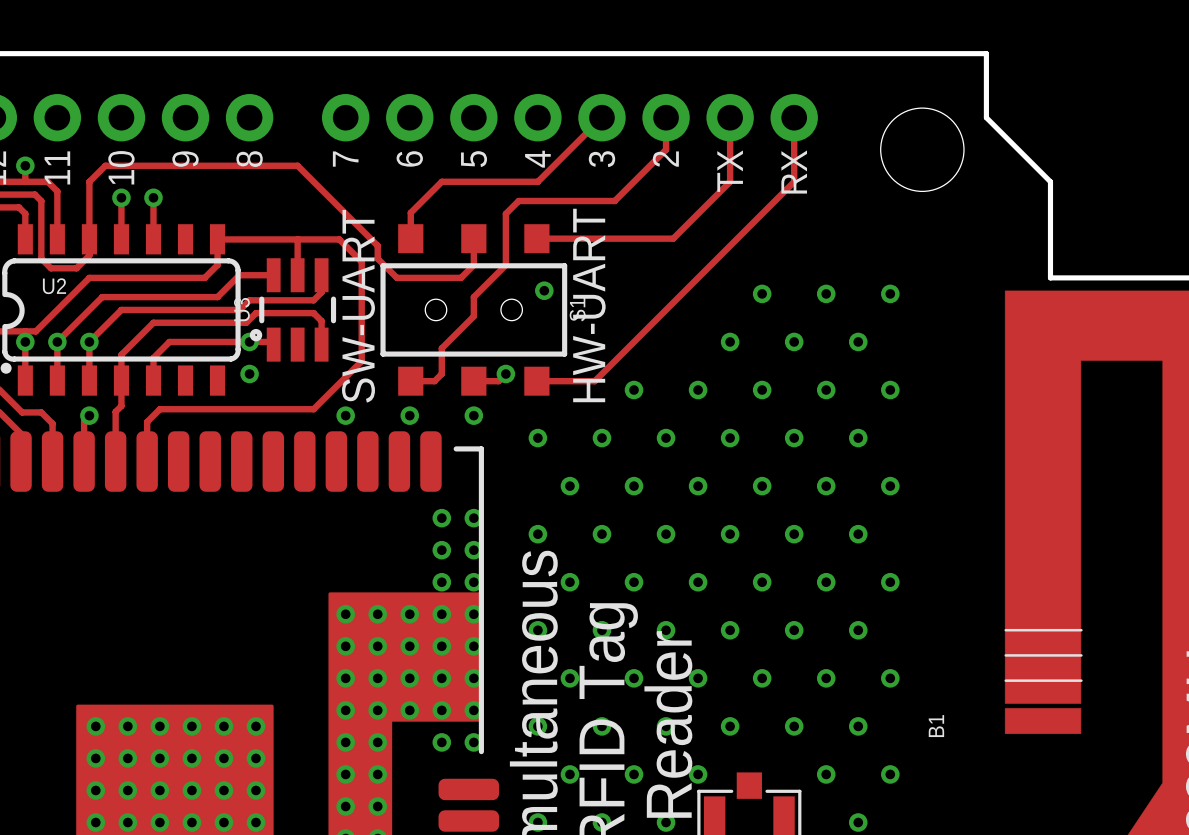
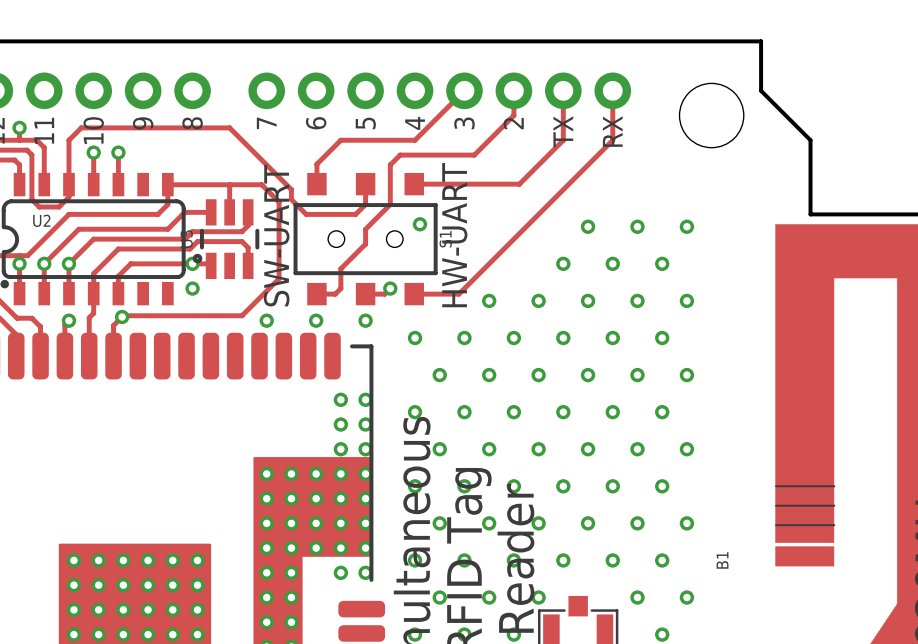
via: none -> (122, 316)

